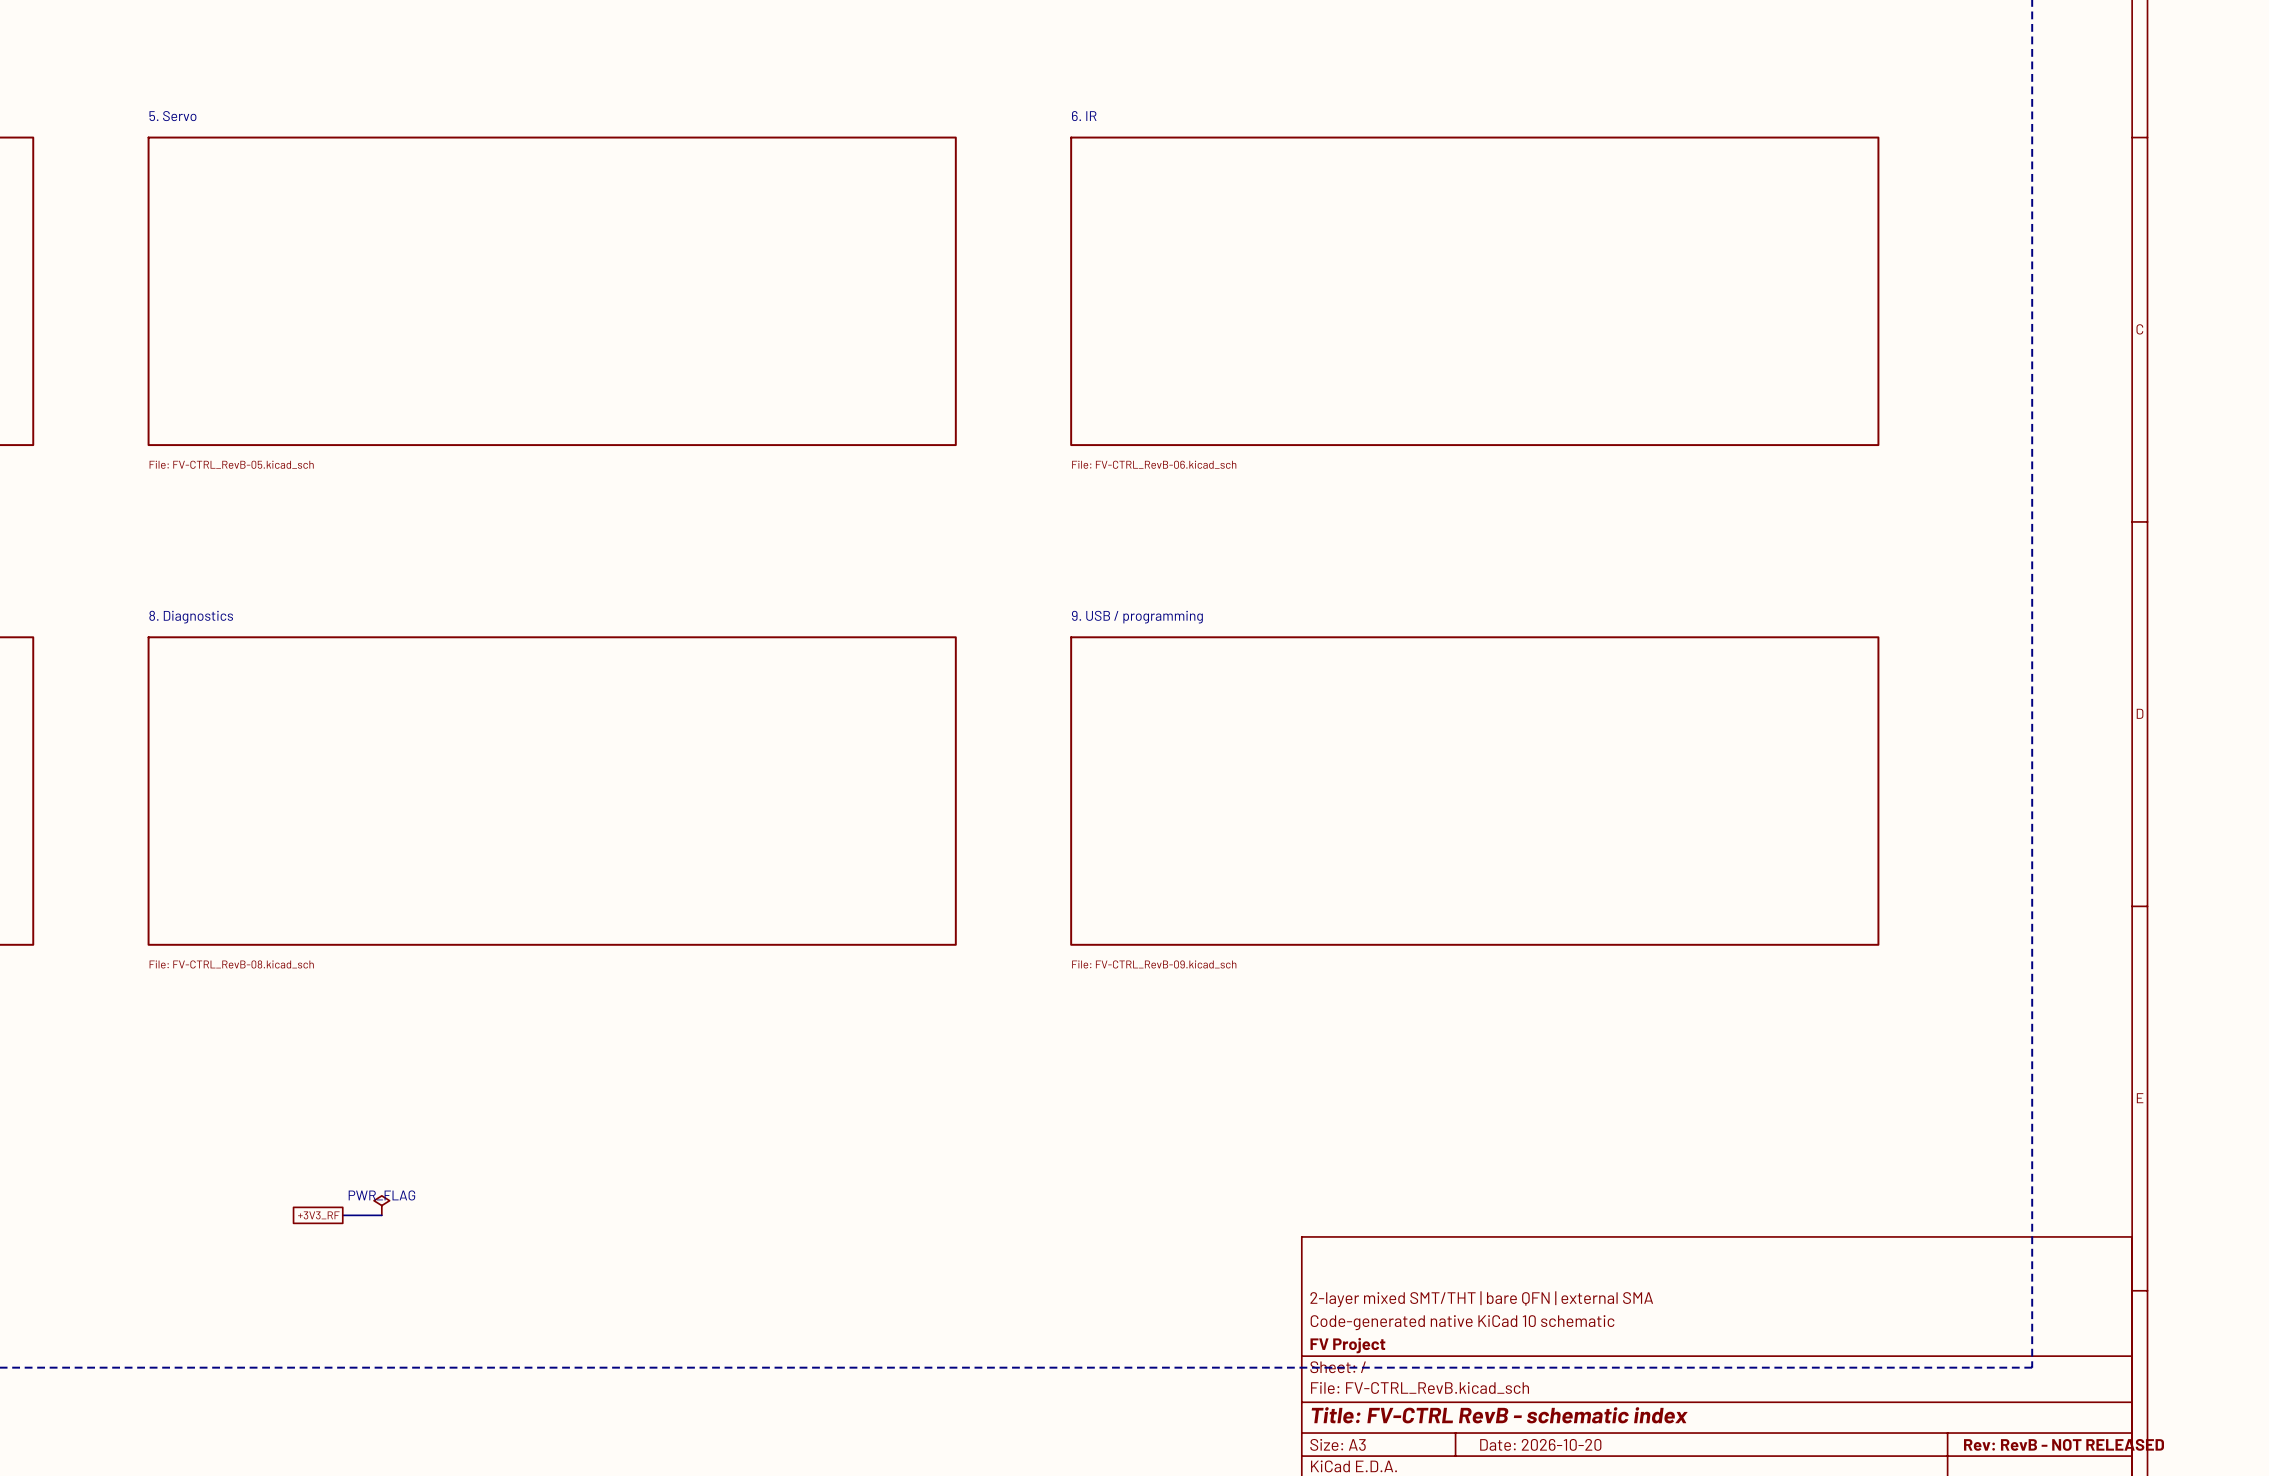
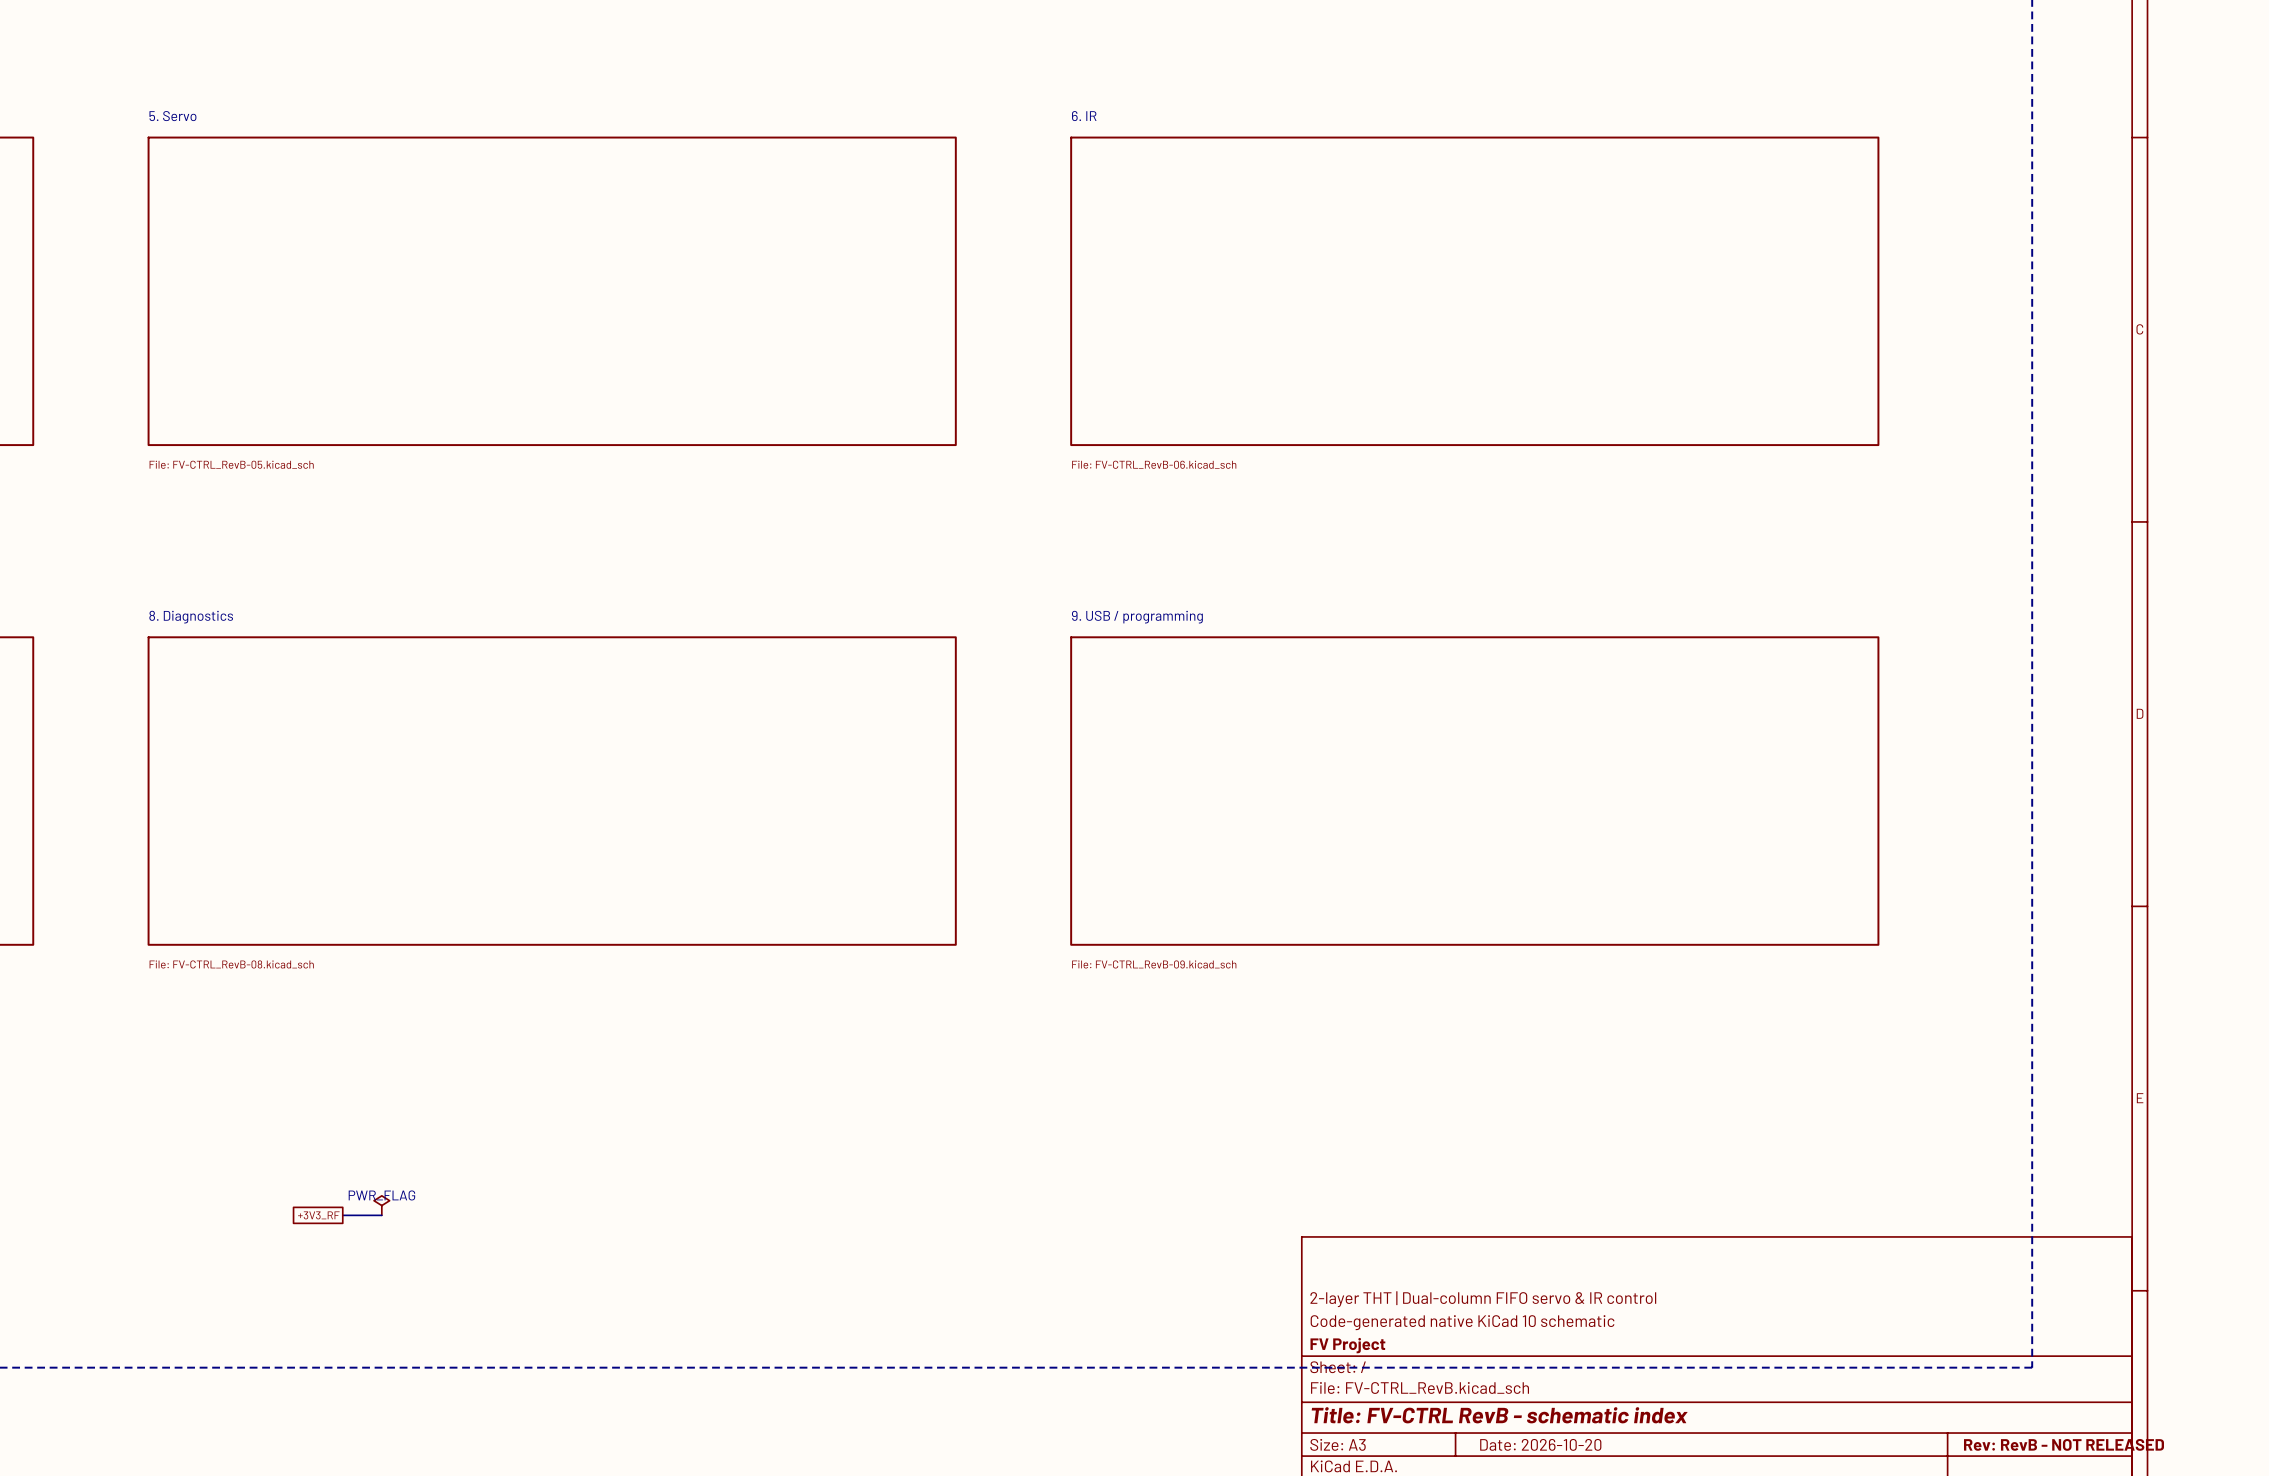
title block: 2-layer mixed SMT/THT | bare QFN | external SMA (1481, 1299) -> 2-layer THT | Dual-column FIFO servo & IR control (1483, 1299)

